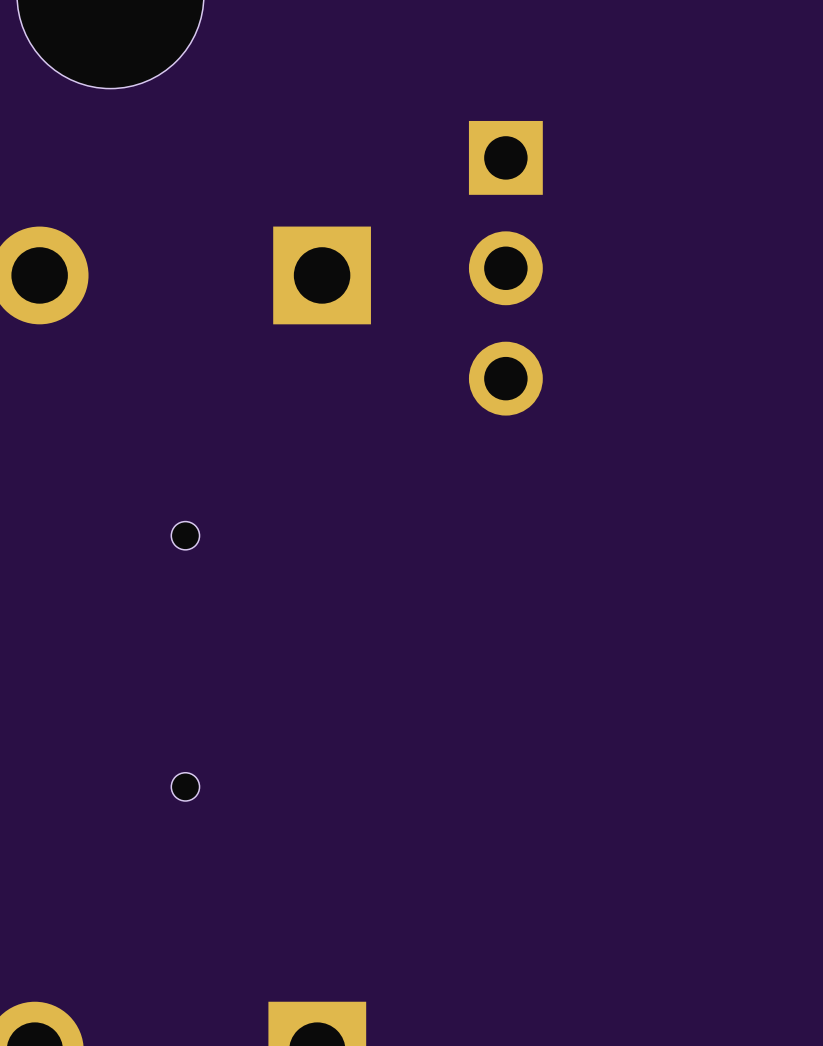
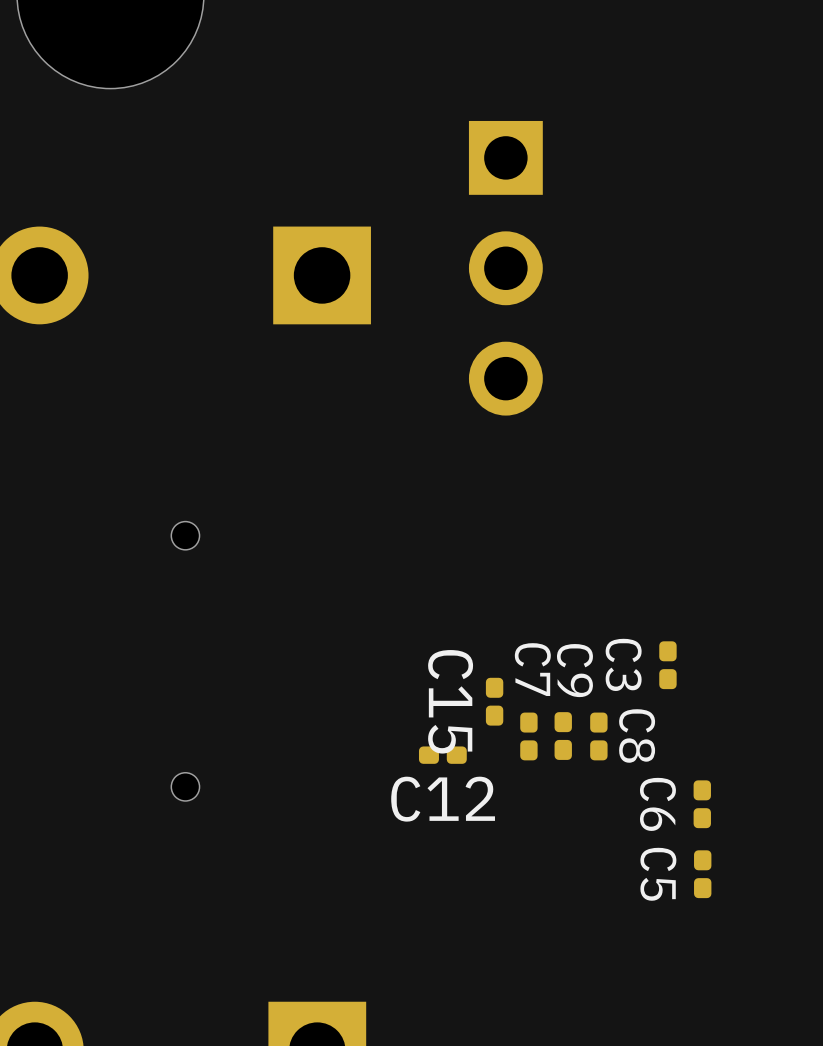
C3: none -> (667, 665)
C15: none -> (494, 701)
C7: none -> (528, 736)
C9: none -> (563, 736)
C8: none -> (598, 736)
C12: none -> (442, 755)
C6: none -> (702, 804)
C5: none -> (702, 874)

